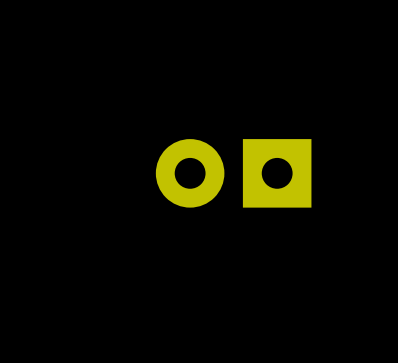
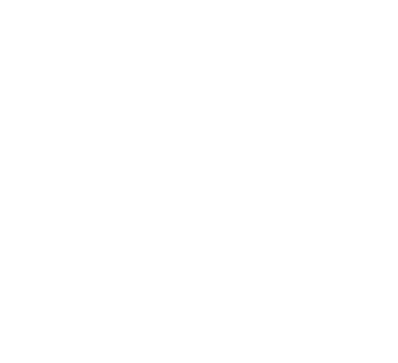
part: (233, 173) -> none

